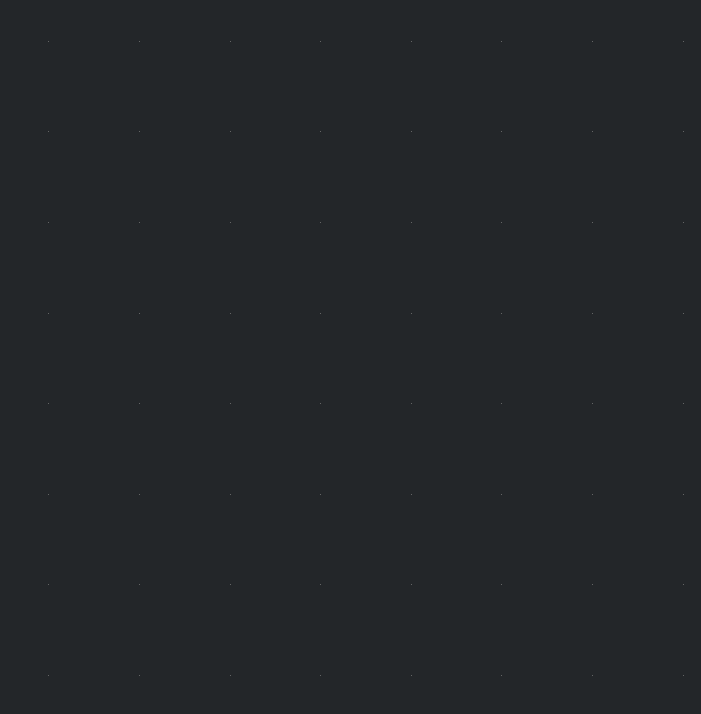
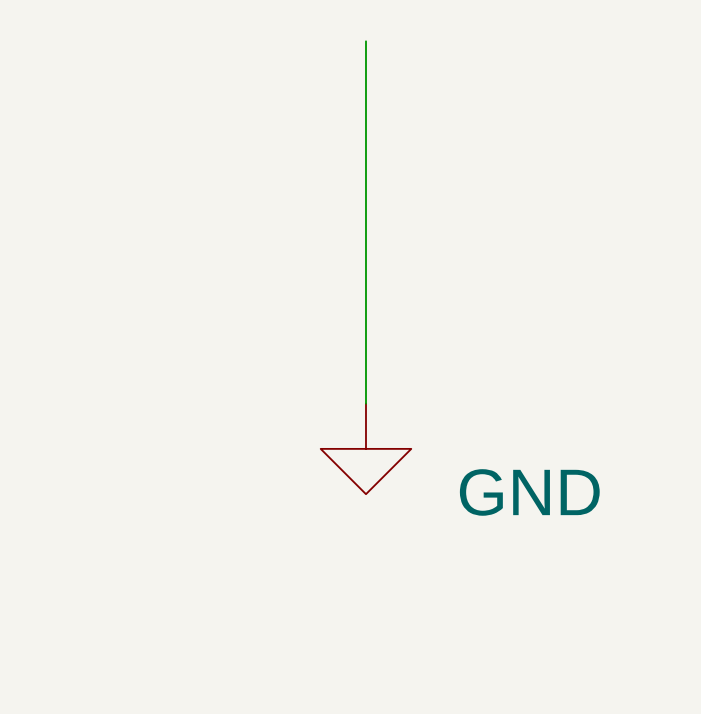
wire: none -> (365, 41) (365, 403)
power symbol: none -> GND (365, 448)

